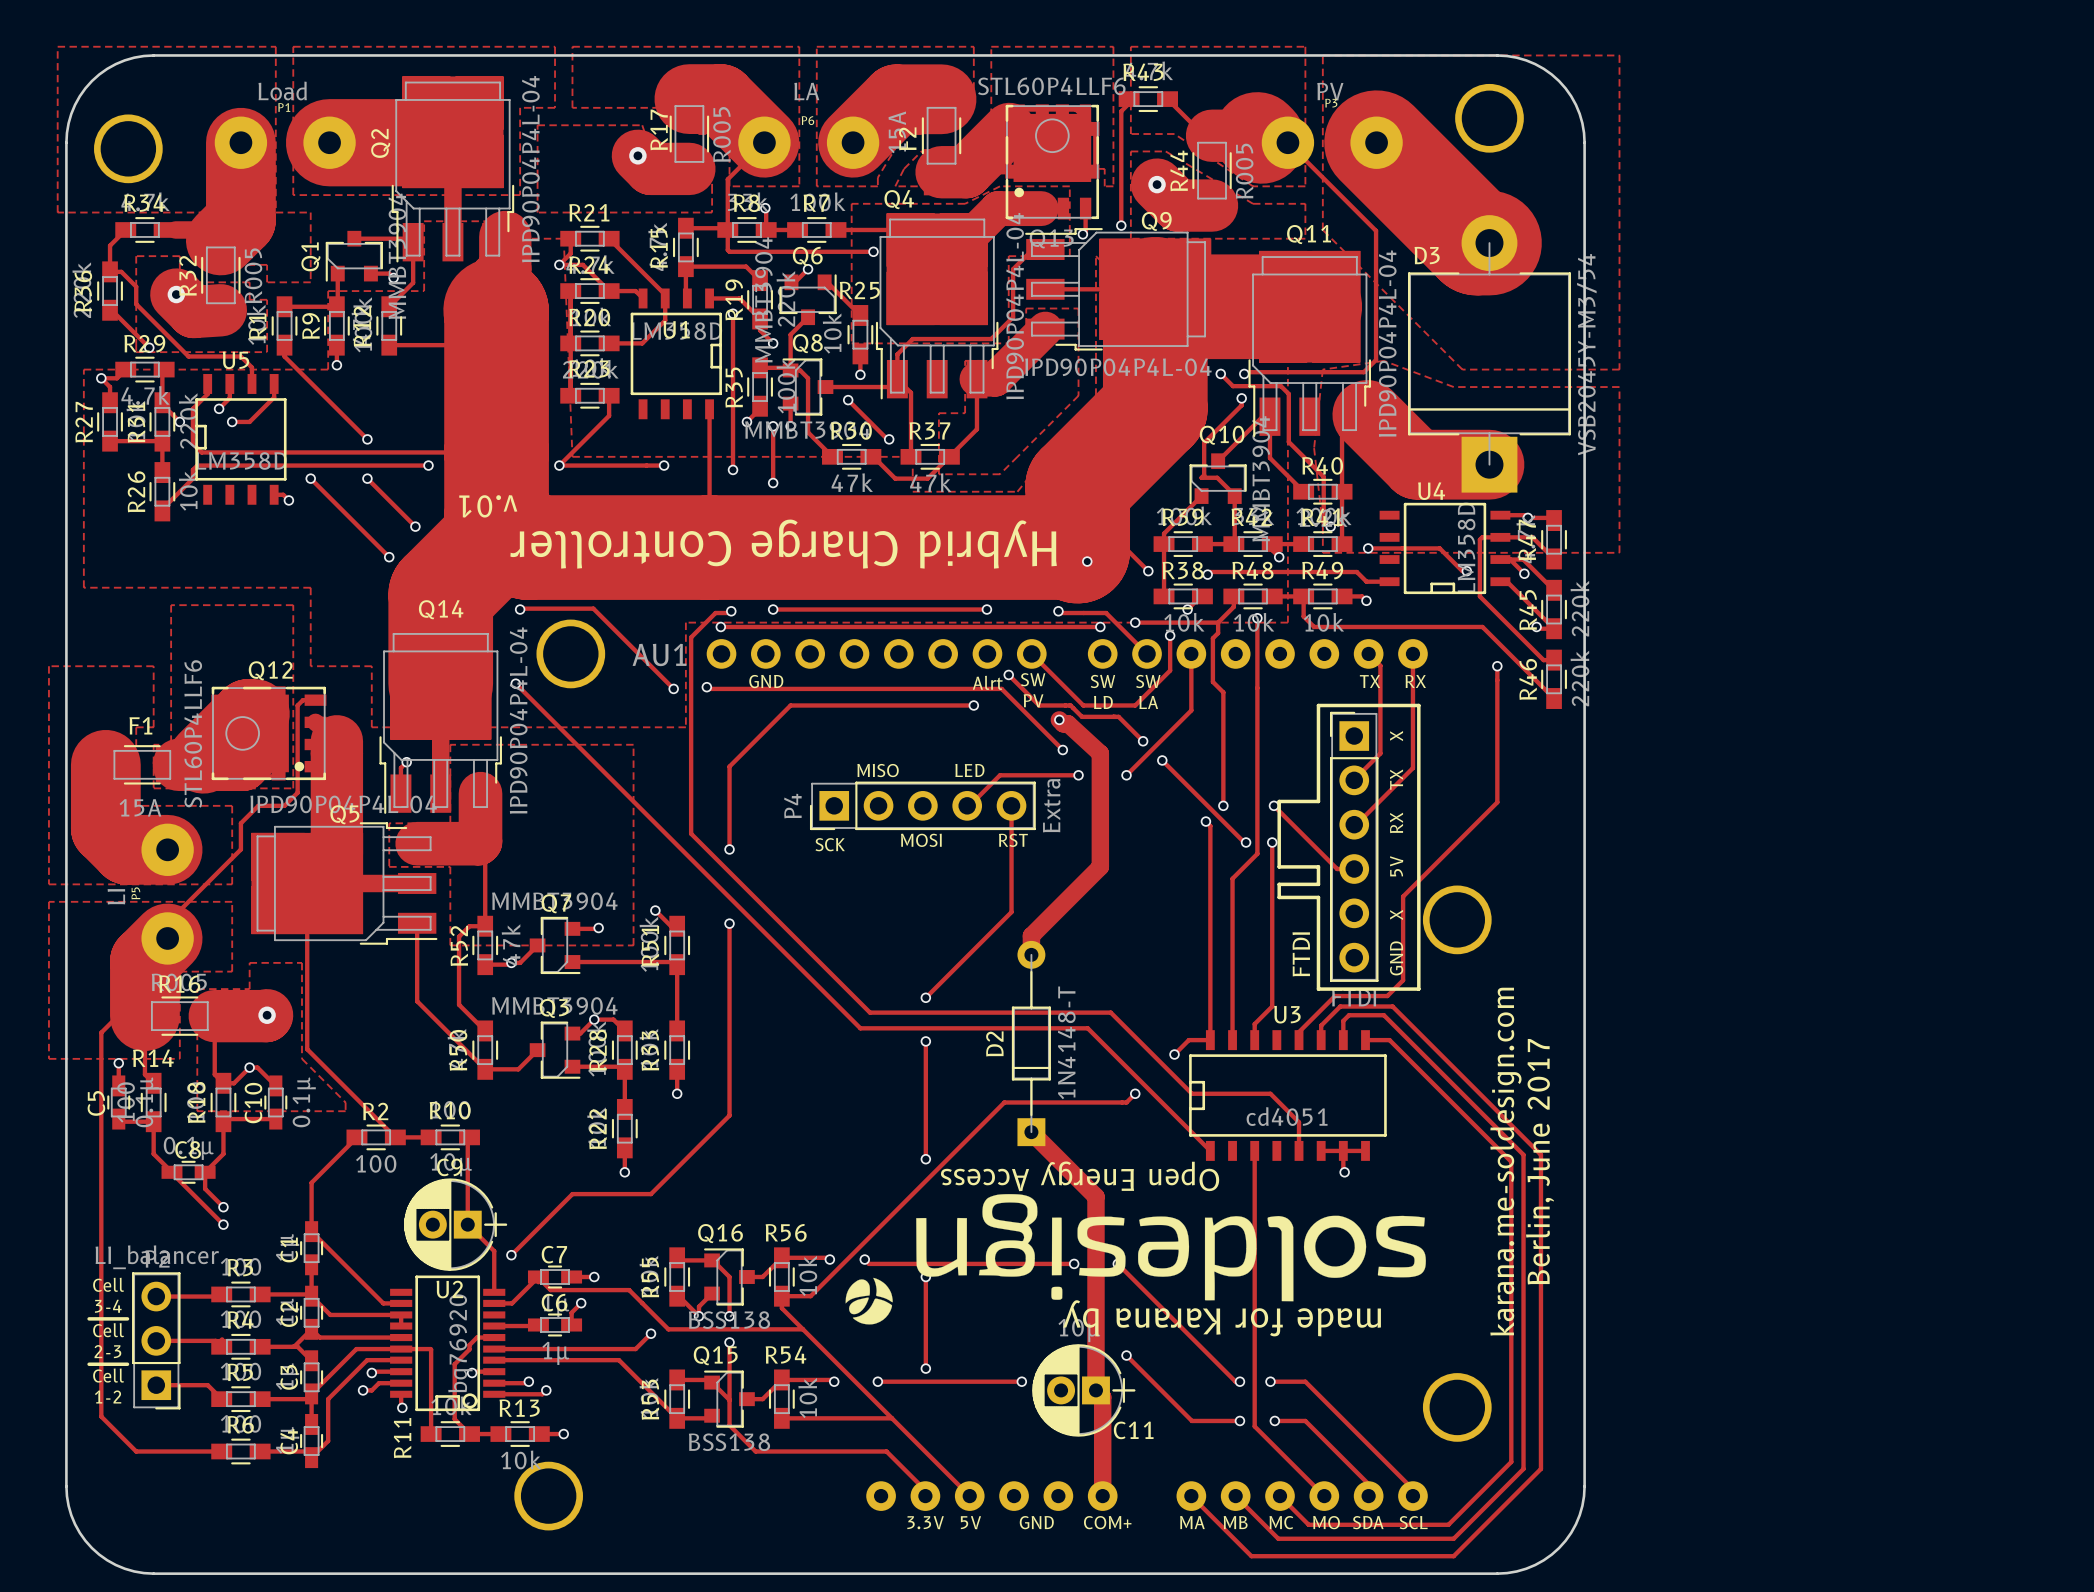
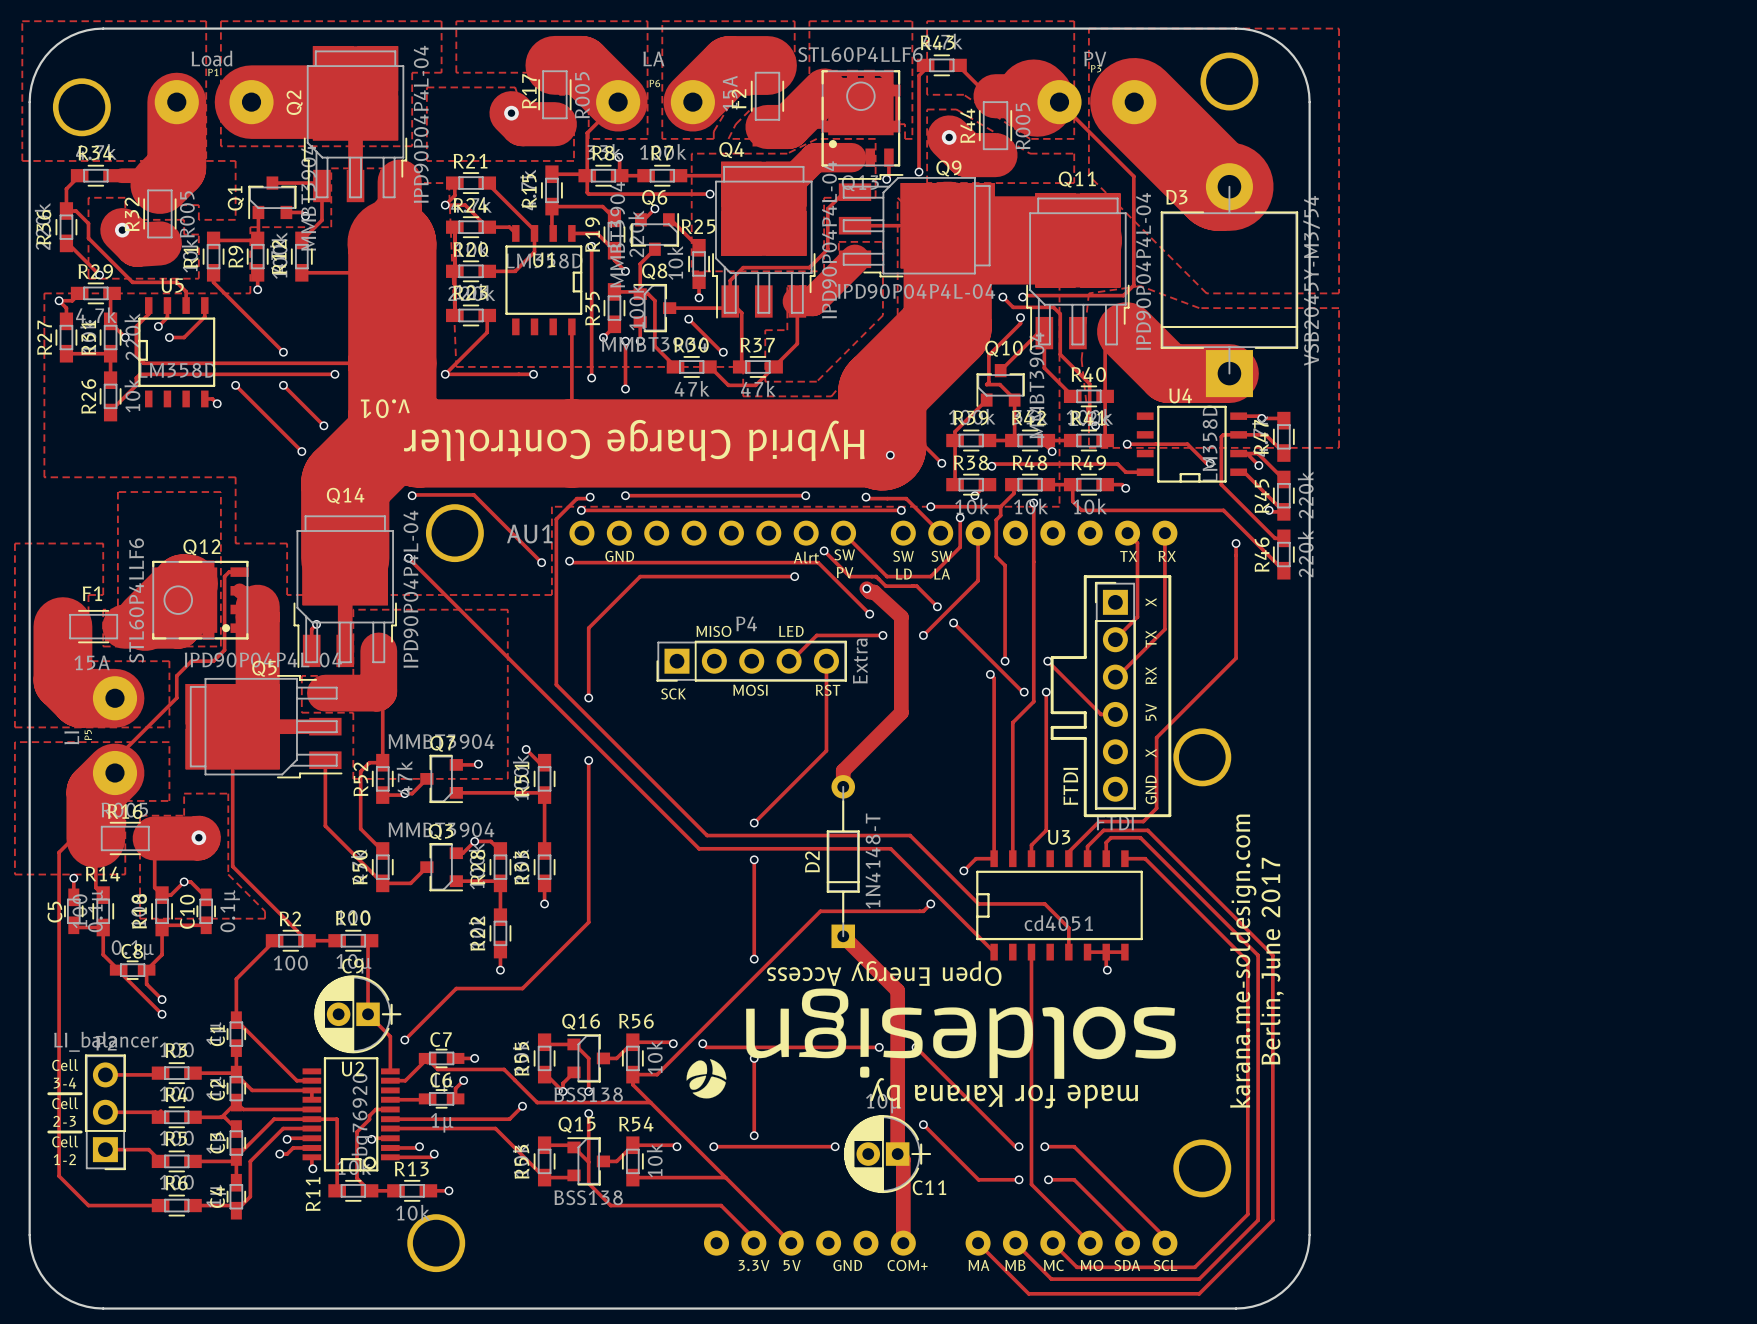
P4 name rotation: 0° (792, 806) -> 90° clockwise (746, 623)
P4 name position: P4 (792, 806) -> P4 (746, 623)

